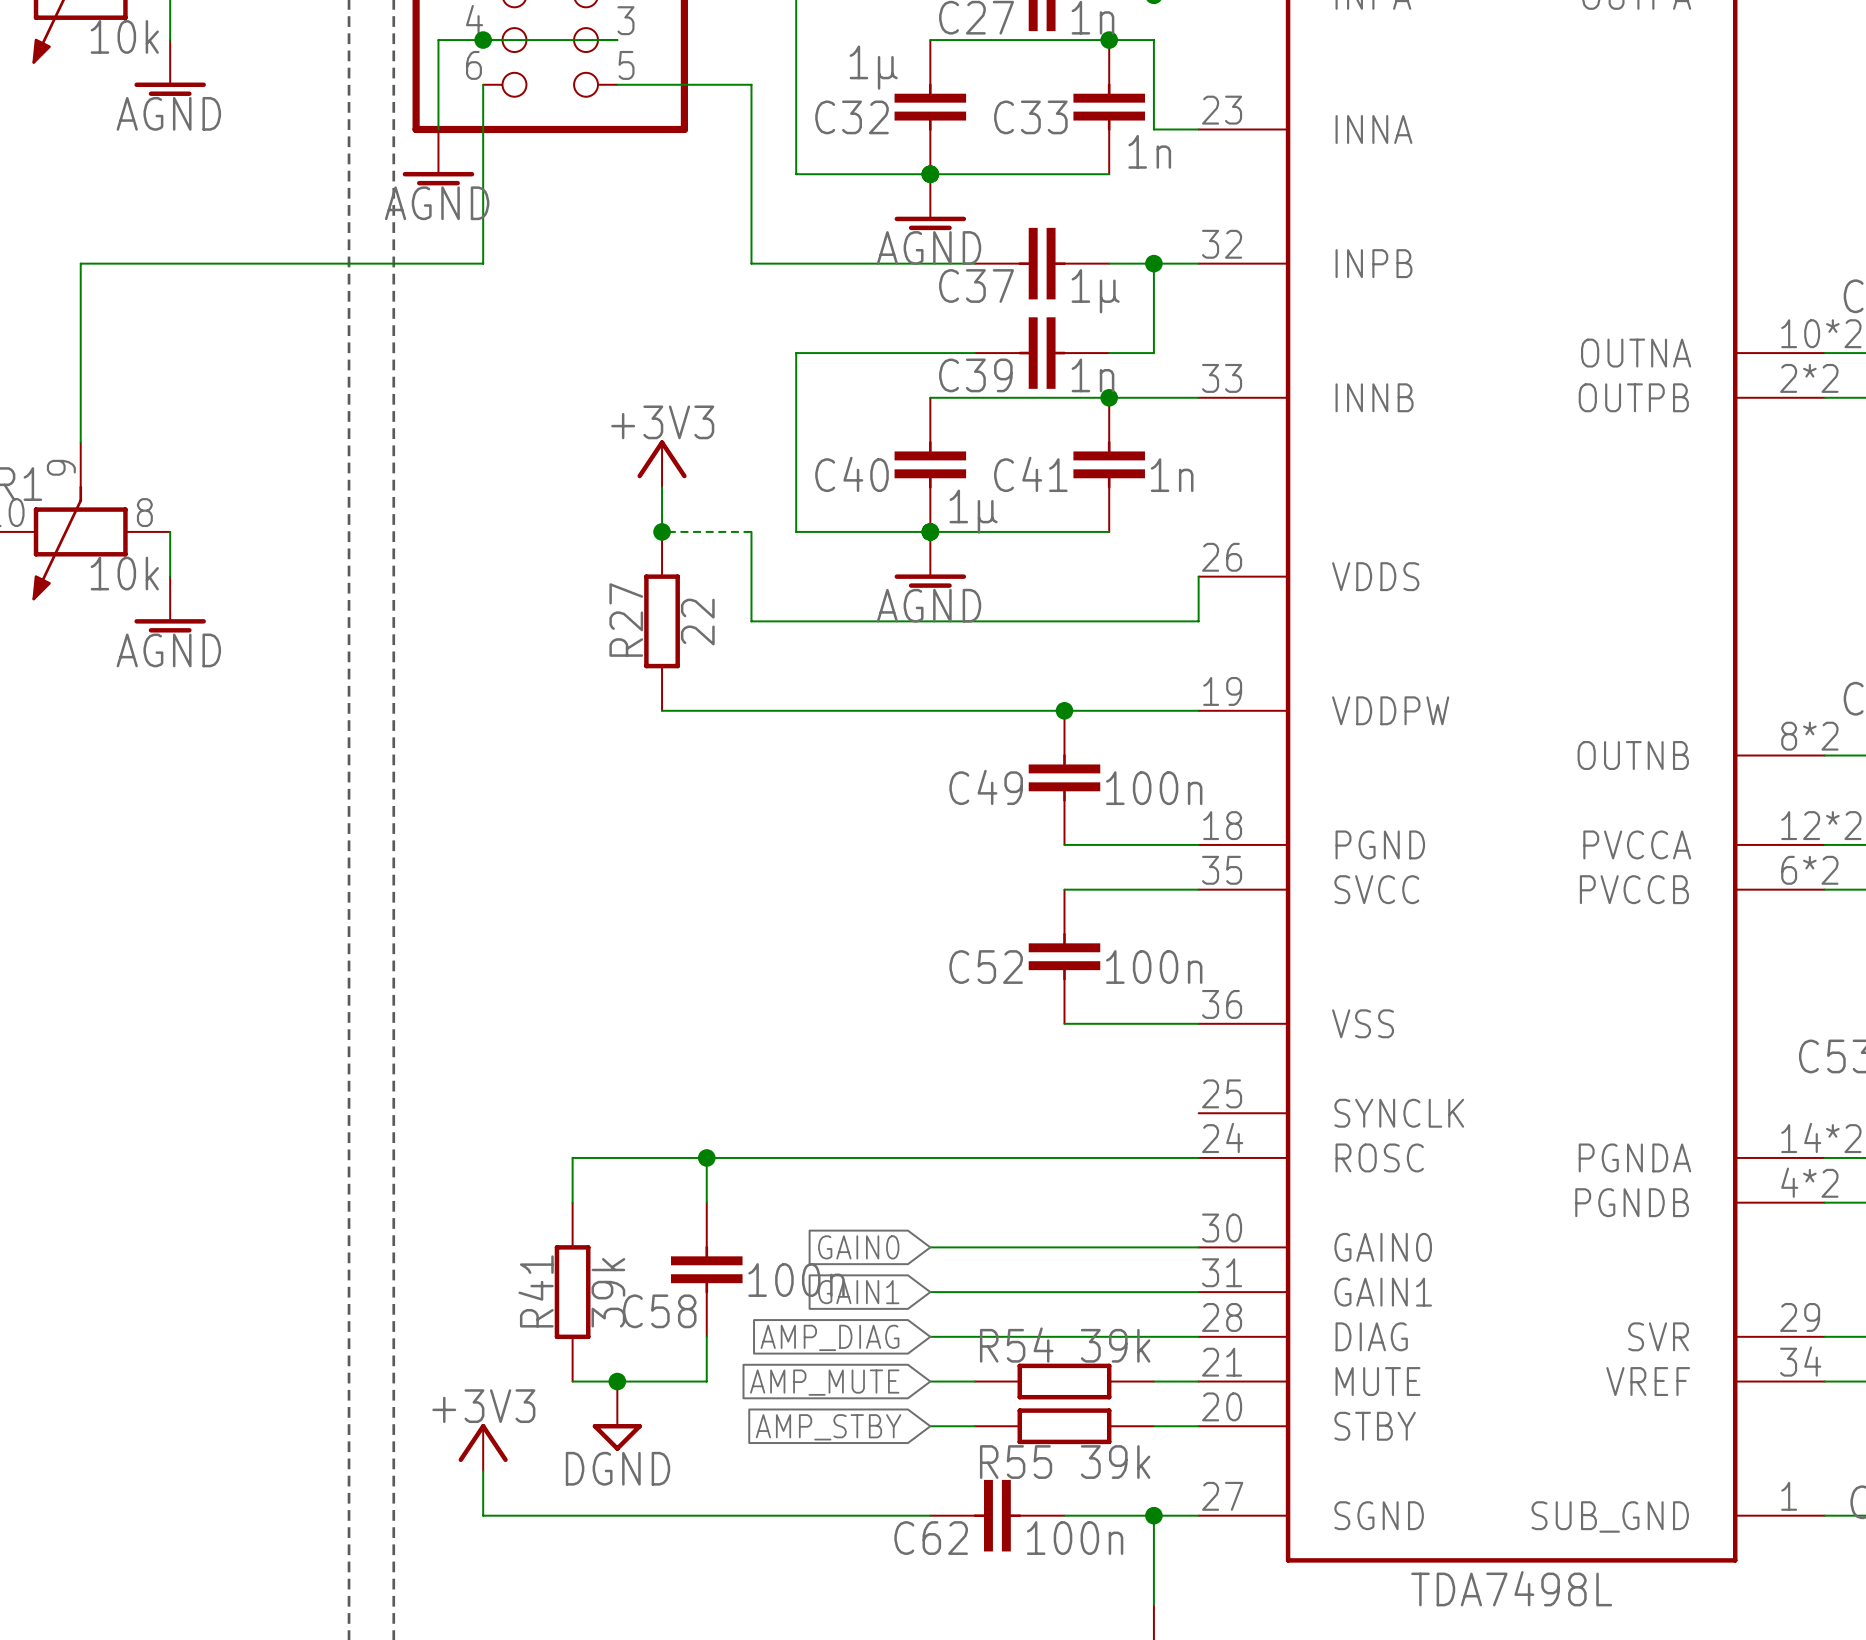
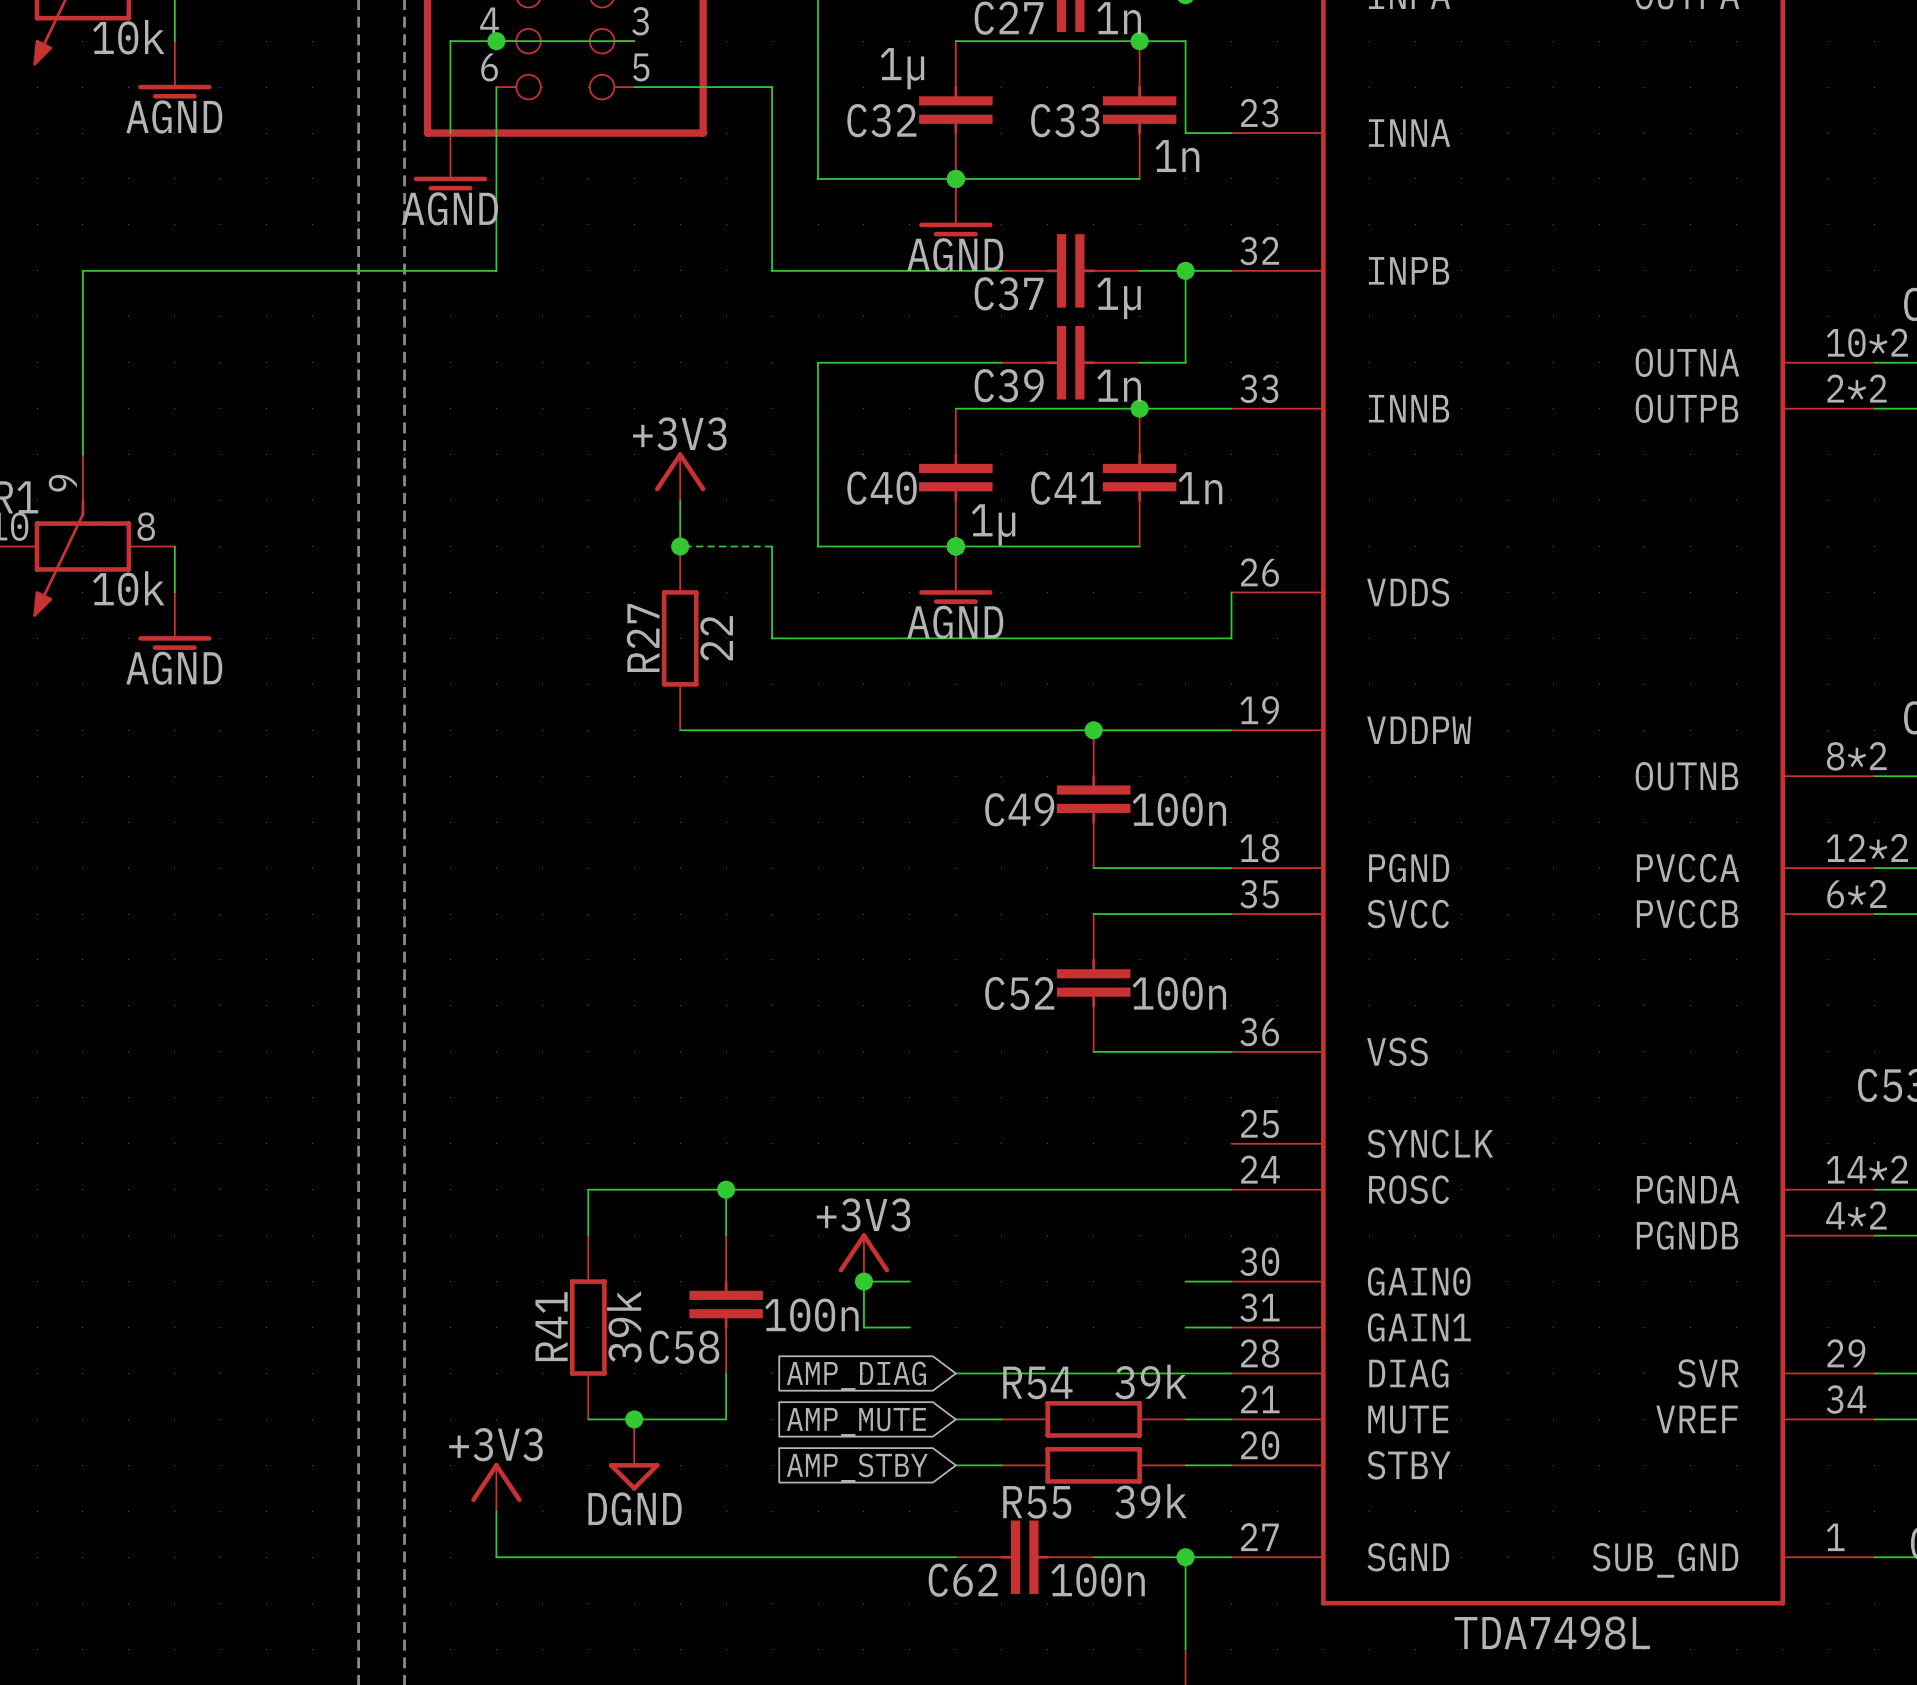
power symbol: none -> +3V3 (863, 1257)
junction: none -> (863, 1281)
global label: GAIN0 (858, 1247) -> none
wire: none -> (909, 1281) (863, 1281) (863, 1327) (909, 1327)
wire: (930, 1247) (1153, 1247) -> none
global label: GAIN1 (858, 1292) -> none
wire: (930, 1292) (1153, 1292) -> none

